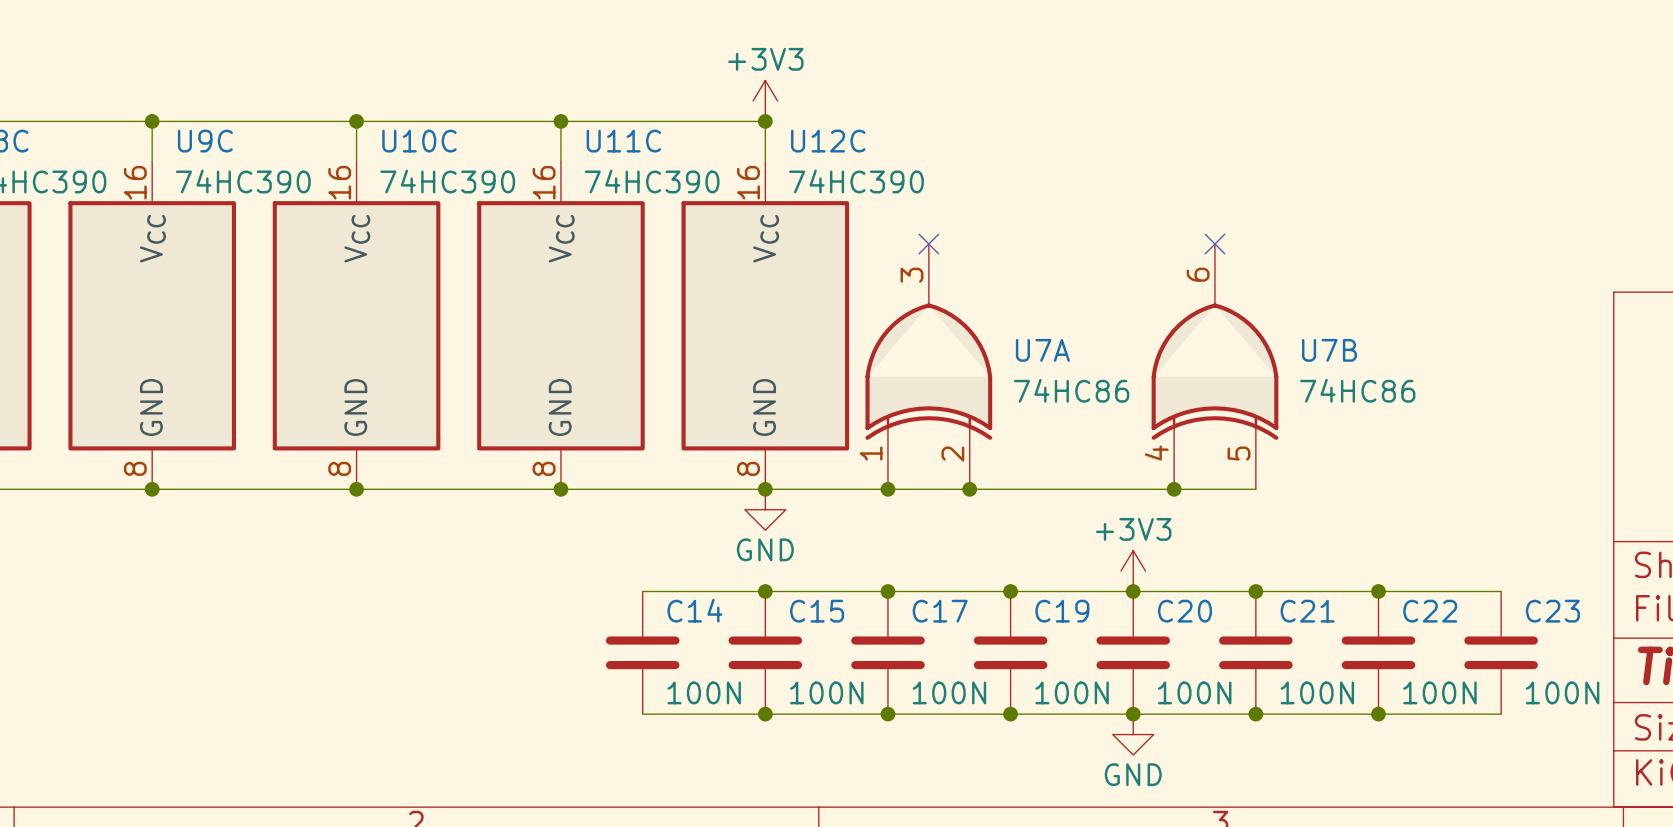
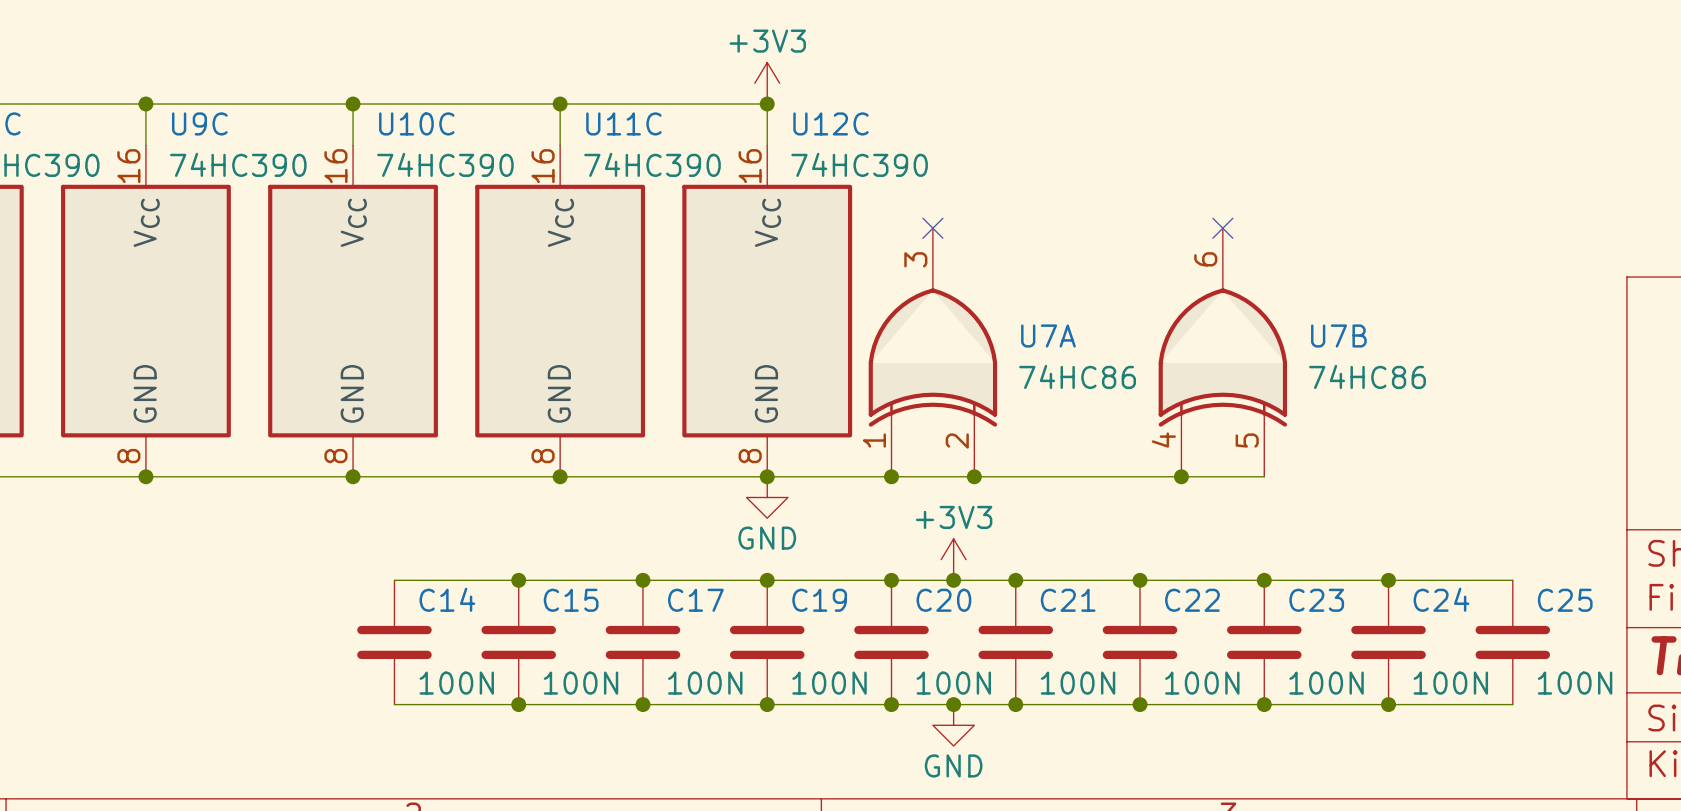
power symbol position: +3V3 (1133, 571) -> +3V3 (953, 559)
wire: none -> (394, 580) (642, 580)
junction: none -> (518, 580)
junction: none -> (642, 580)
junction: none -> (953, 580)
C14 name: C14 (694, 610) -> C17 (695, 600)
C15 name: C15 (817, 611) -> C19 (819, 600)
C17 name: C17 (940, 611) -> C20 (943, 600)
C19 name: C19 (1062, 611) -> C21 (1068, 600)
C20 name: C20 (1184, 611) -> C22 (1192, 600)
C21 name: C21 (1307, 611) -> C23 (1316, 600)
C22 name: C22 (1430, 611) -> C24 (1441, 599)
C23 name: C23 (1552, 611) -> C25 (1565, 600)
C14: none -> 100N (394, 642)
C15: none -> 100N (518, 642)
wire: none -> (394, 704) (642, 704)
junction: none -> (518, 704)
junction: none -> (642, 704)
junction: none -> (953, 704)
power symbol position: GND (1133, 734) -> GND (953, 725)

